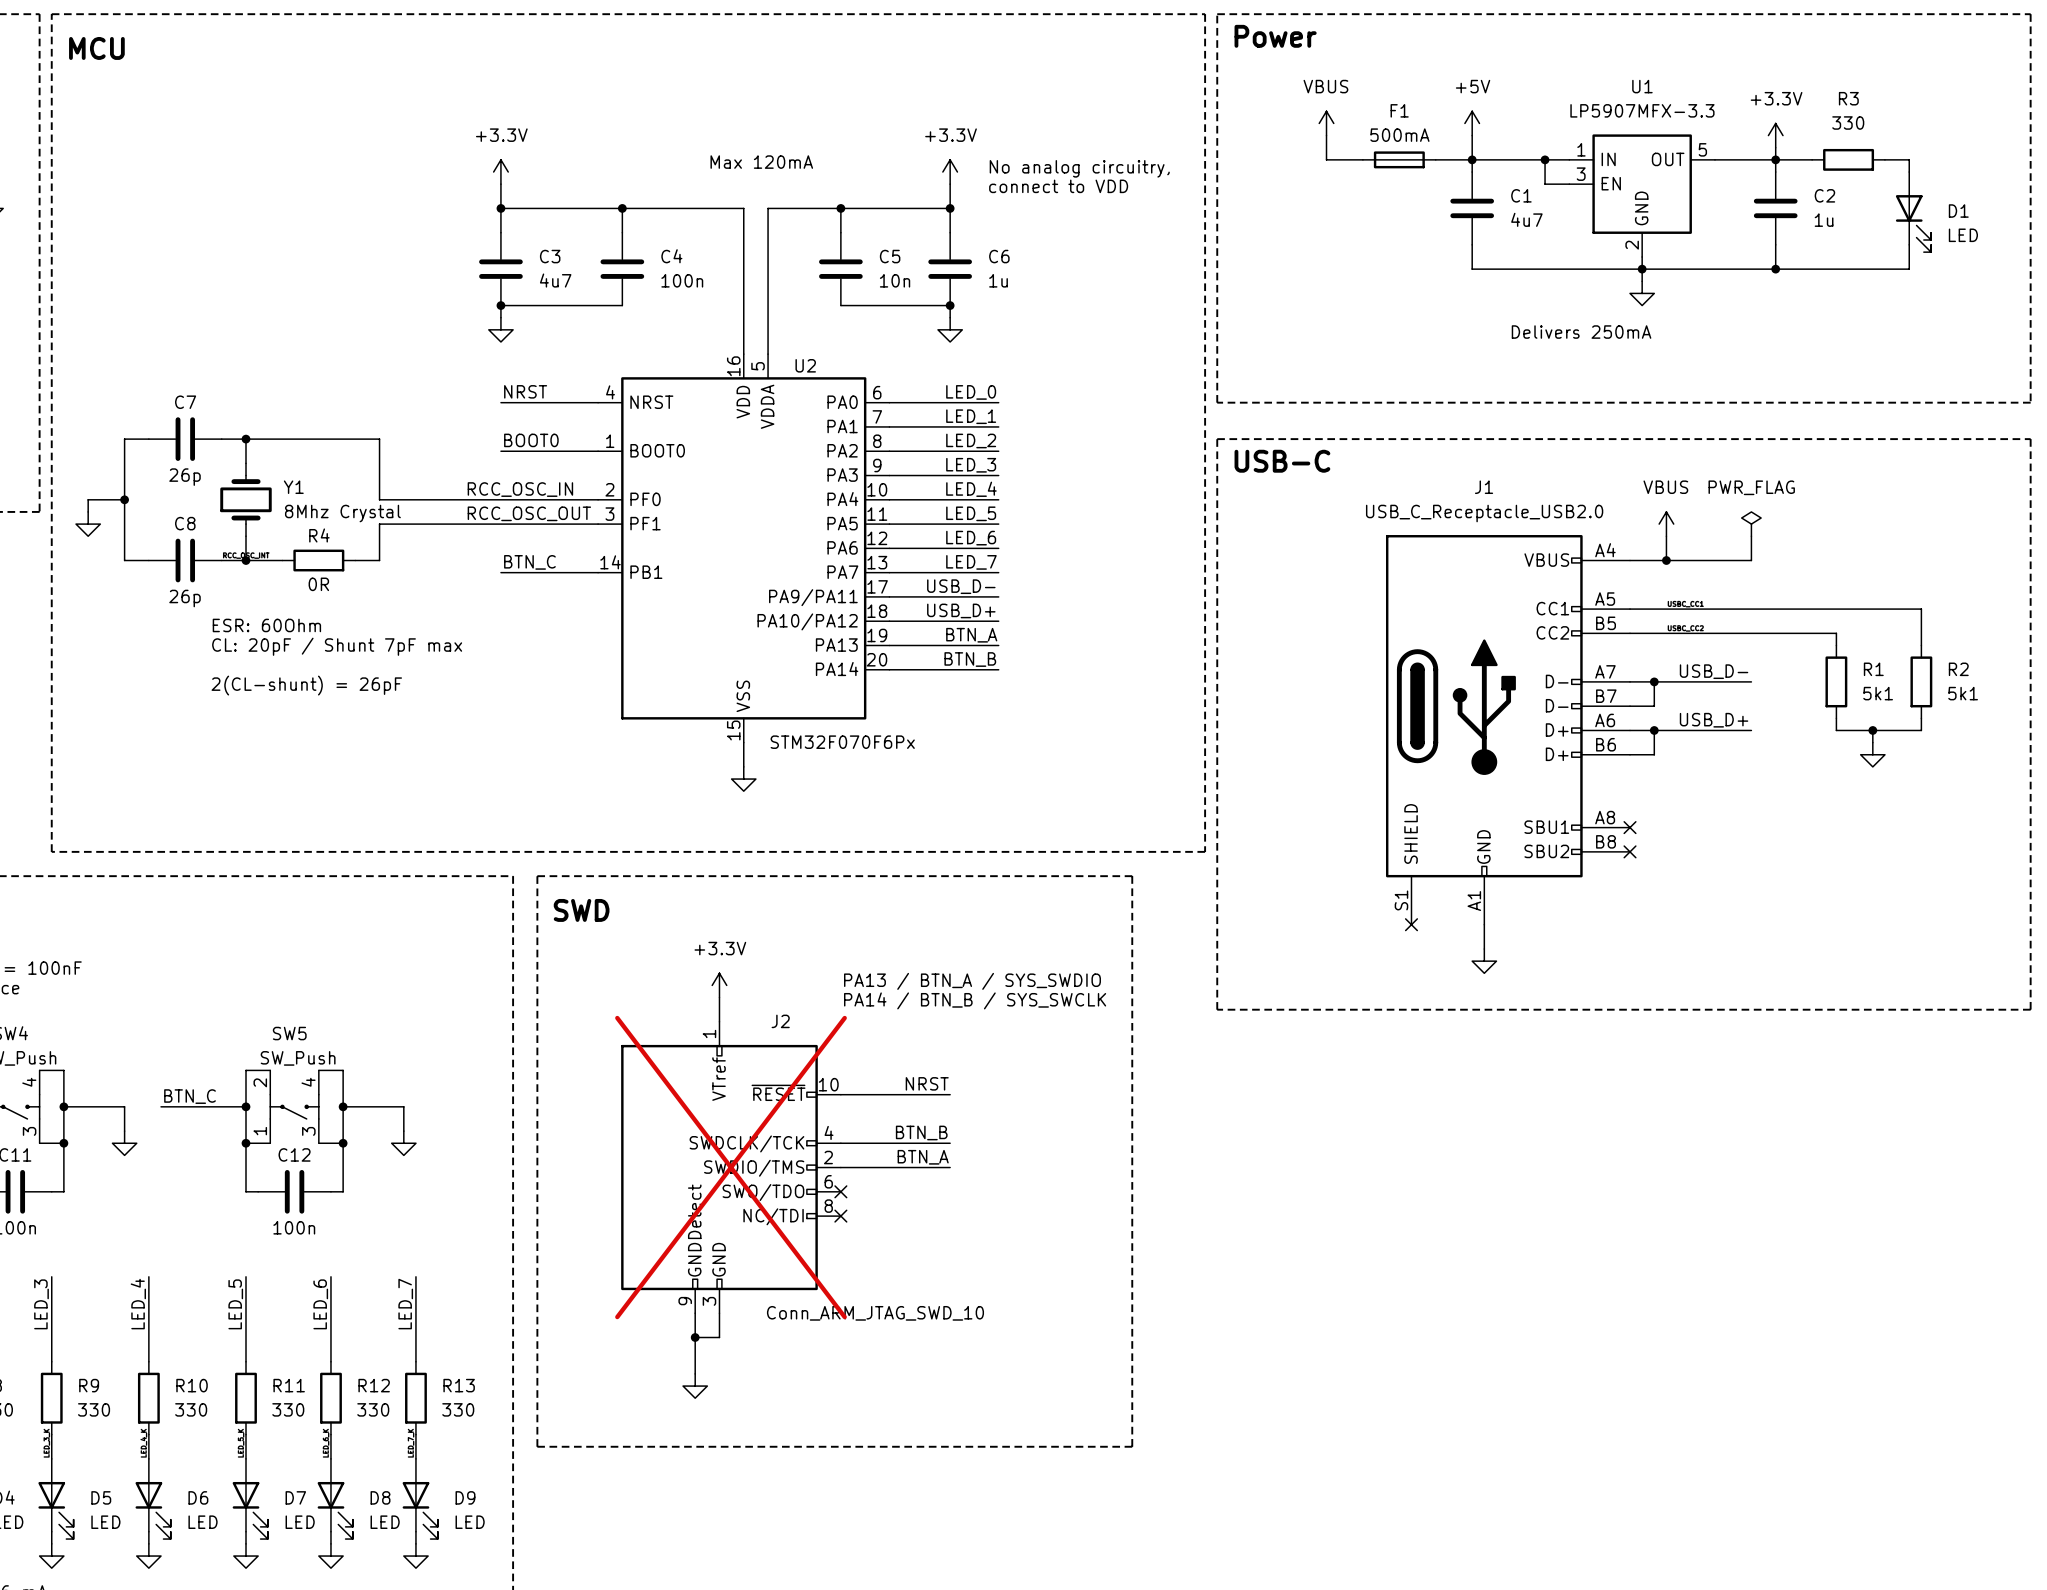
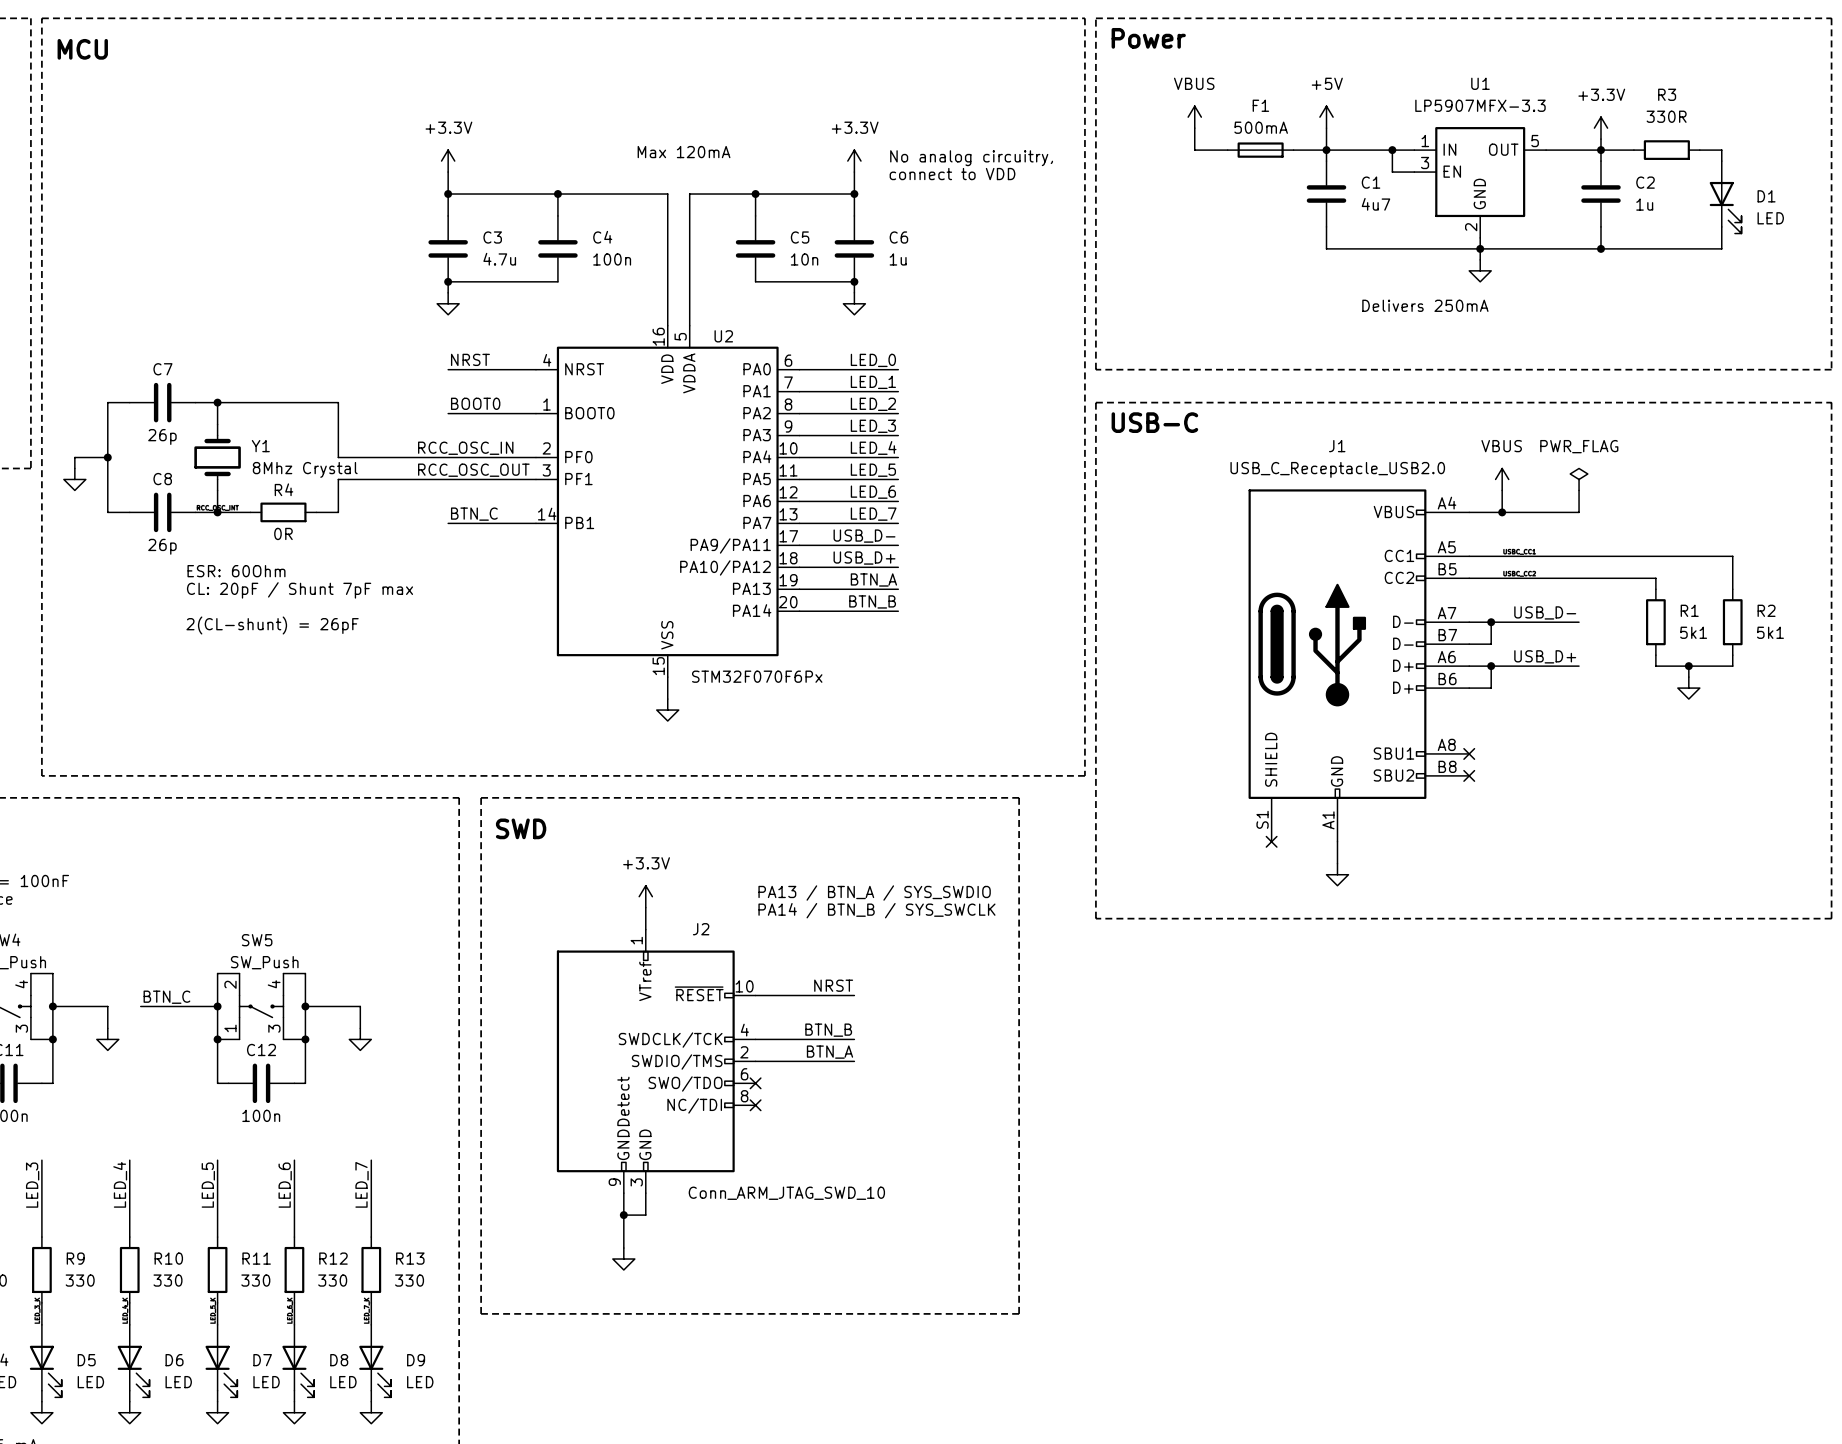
R3 value: 330 (1848, 123) -> 330R (1666, 116)
C3 value: 4u7 (555, 280) -> 4.7u (499, 259)
J2 do-not-place cross: (731, 1167) -> none

